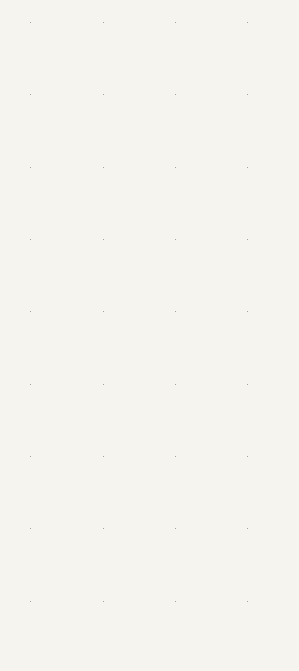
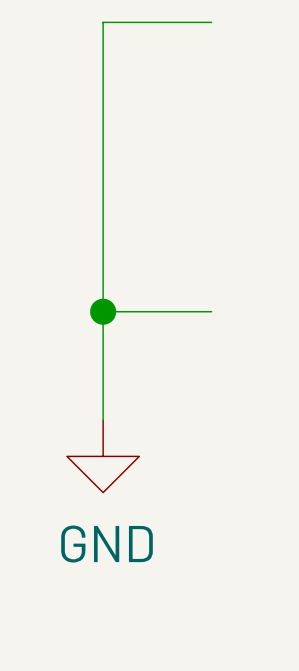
wire: none -> (211, 22) (103, 22) (103, 420)
wire: none -> (103, 311) (211, 311)
junction: none -> (103, 311)
power symbol: none -> GND (103, 456)

